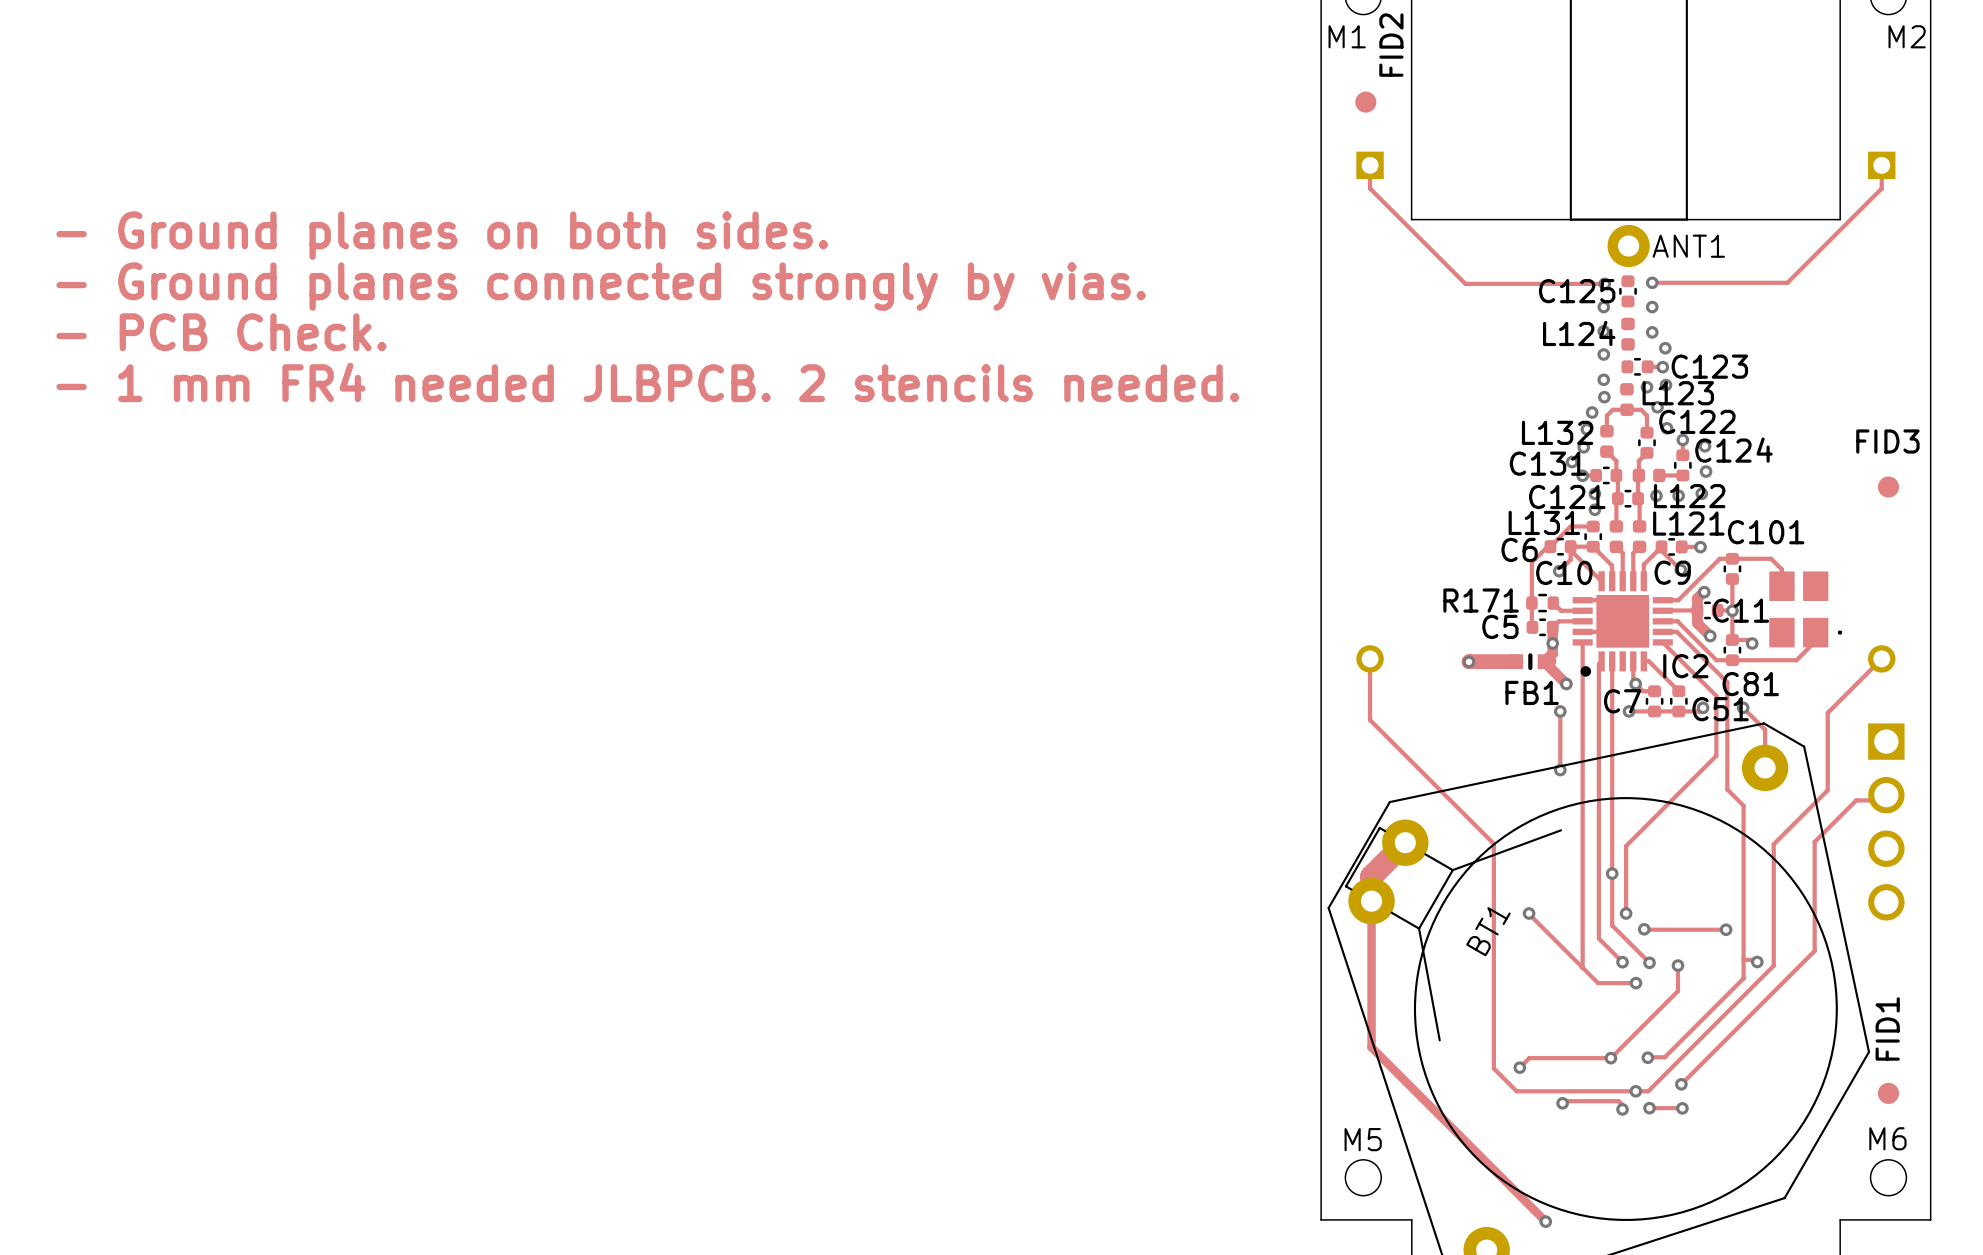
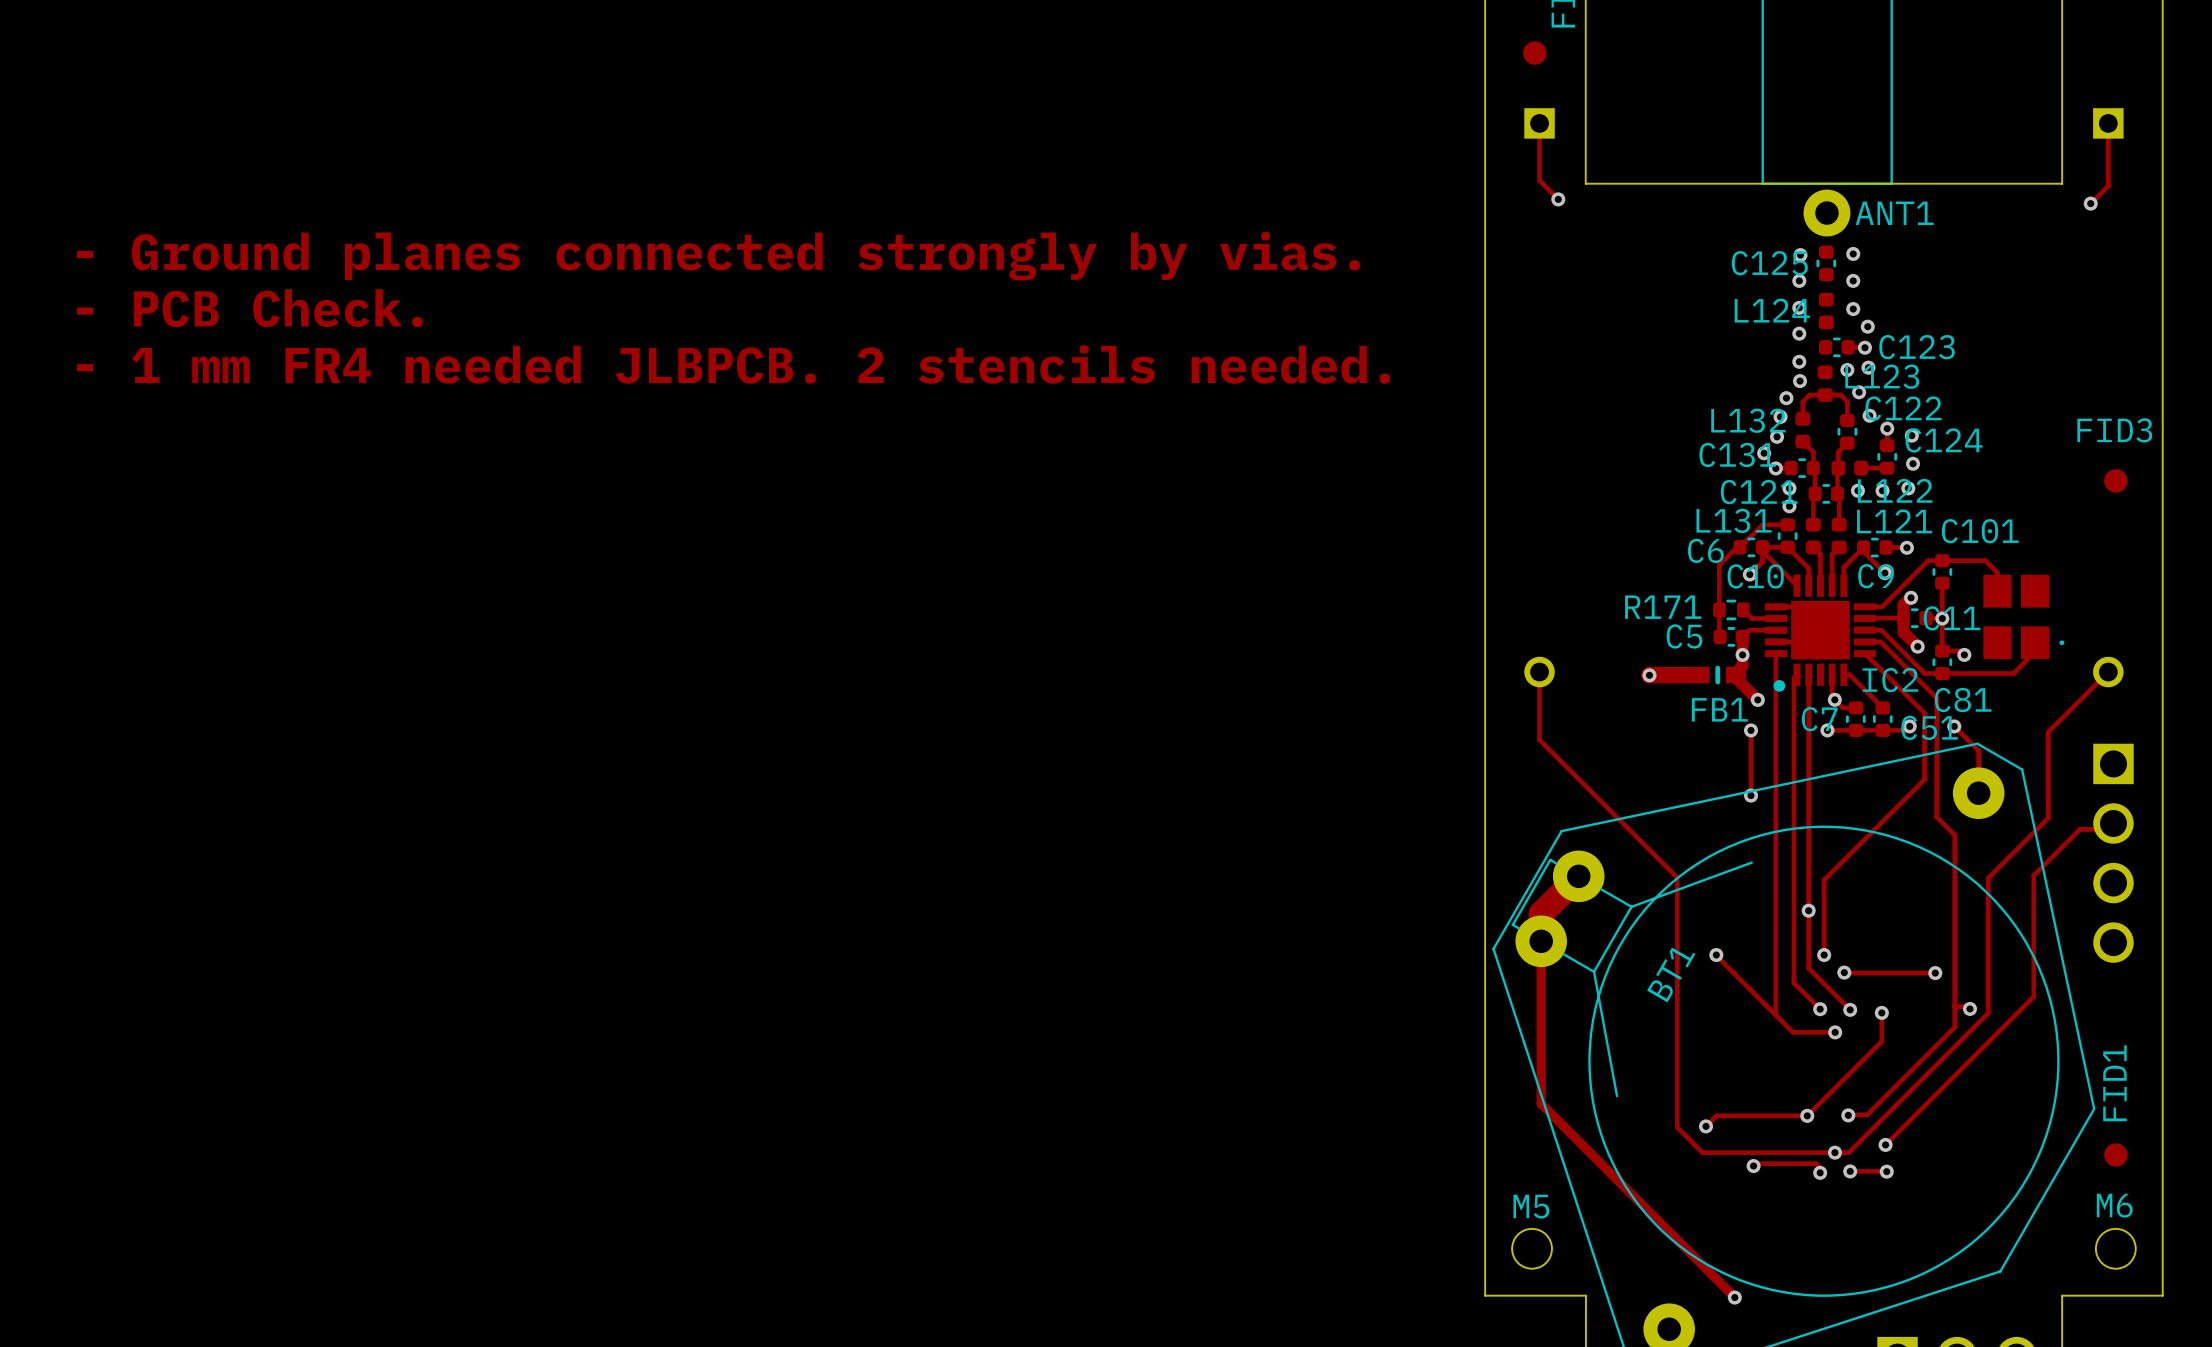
track: (1370, 188) (1465, 283) (1604, 283) -> (1539, 149) (1539, 180) (1558, 199)
track: (1881, 188) (1787, 282) (1652, 282) -> (2108, 149) (2108, 186) (2090, 203)
via: none -> (1558, 199)
text: - Ground planes on both sides. (442, 235) -> none
via: none -> (2090, 203)

